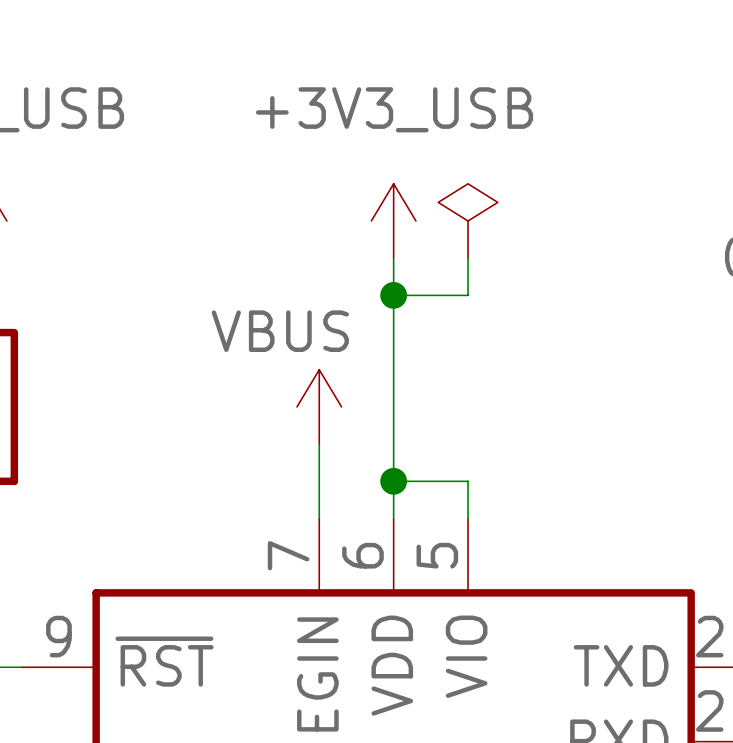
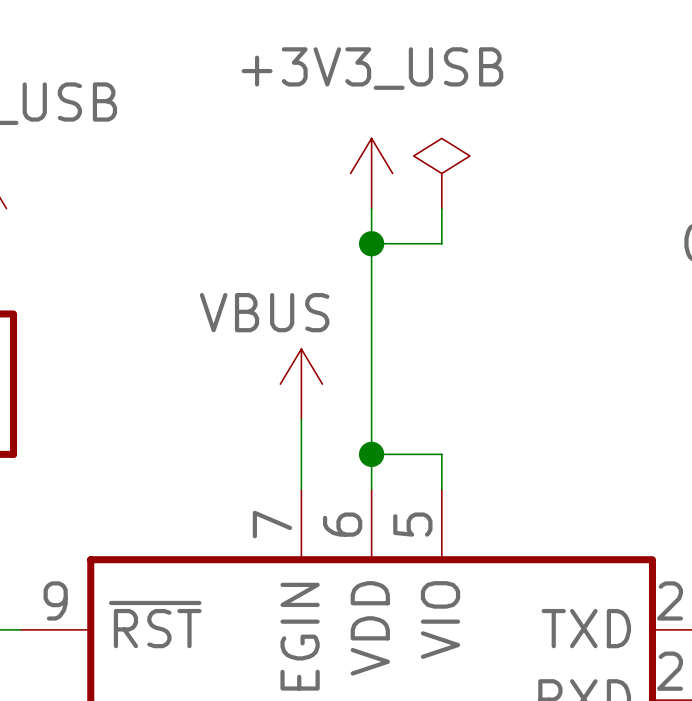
wire: none -> (371, 208) (371, 243) (441, 243) (441, 208)
power symbol position: +3V3_USB (393, 221) -> +3V3_USB (371, 173)
power symbol position: (468, 221) -> (441, 173)
wire: (468, 258) (468, 295) (393, 295) -> none
junction position: (393, 295) -> (371, 243)

